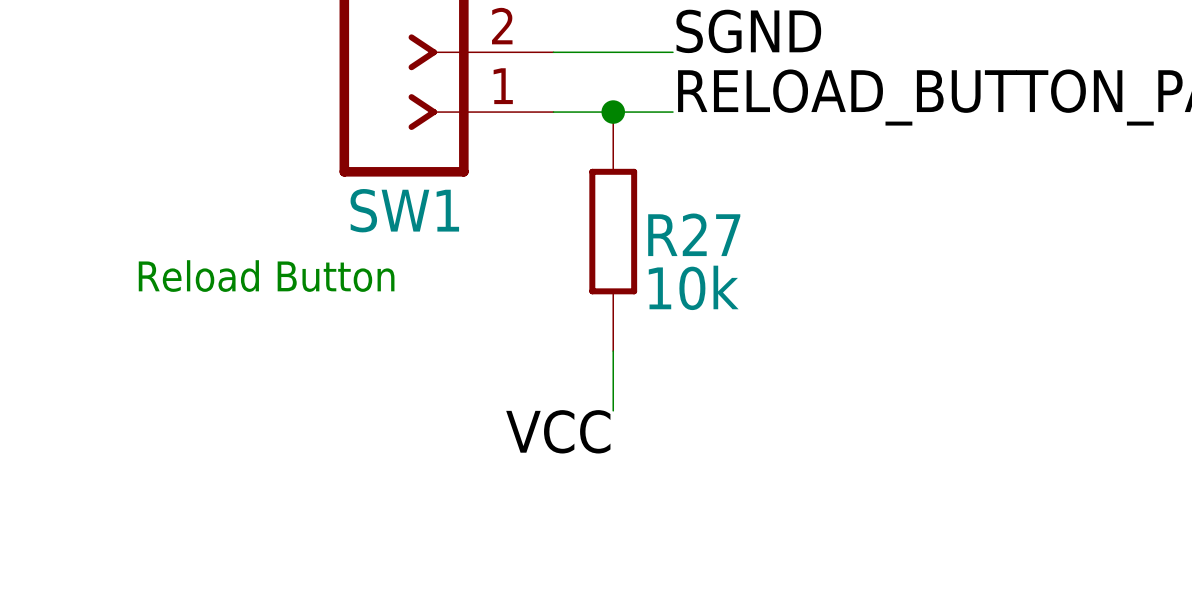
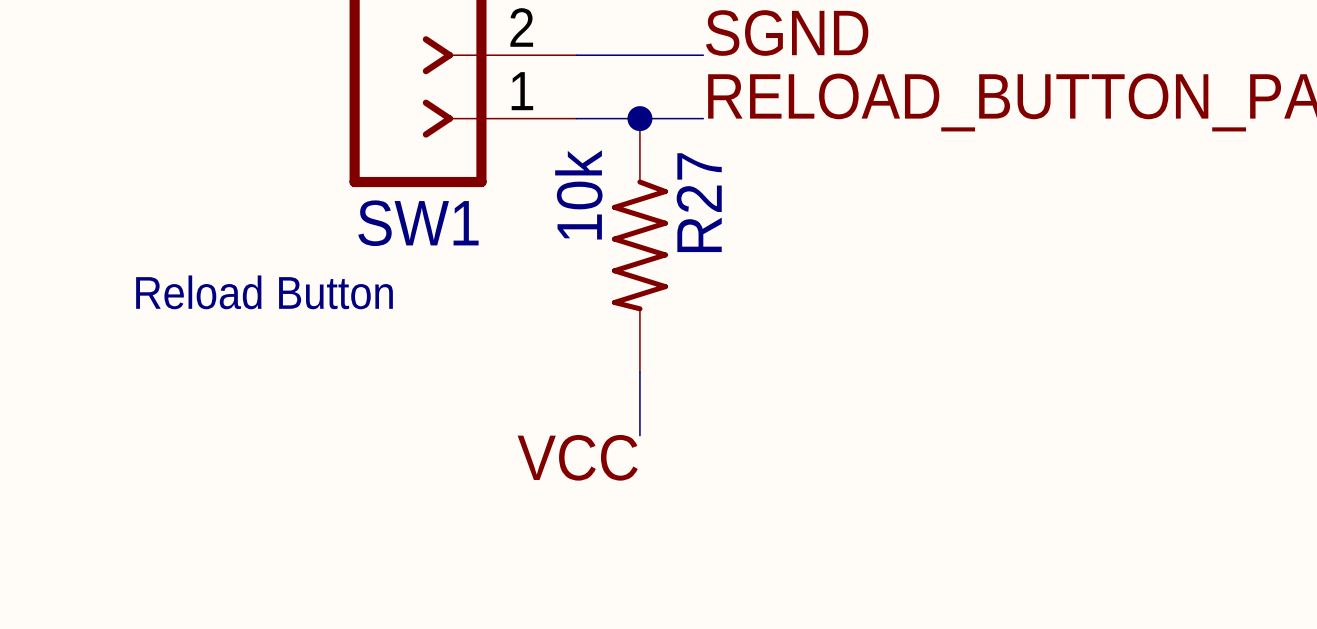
R27 symbol: [589, 112, 638, 352] -> [612, 118, 668, 373]
R27 name rotation: 0° (694, 234) -> 90° counterclockwise (699, 202)
R27 value rotation: 0° (693, 287) -> 90° counterclockwise (578, 194)
R27 value position: 10k (693, 287) -> 10k (578, 194)

